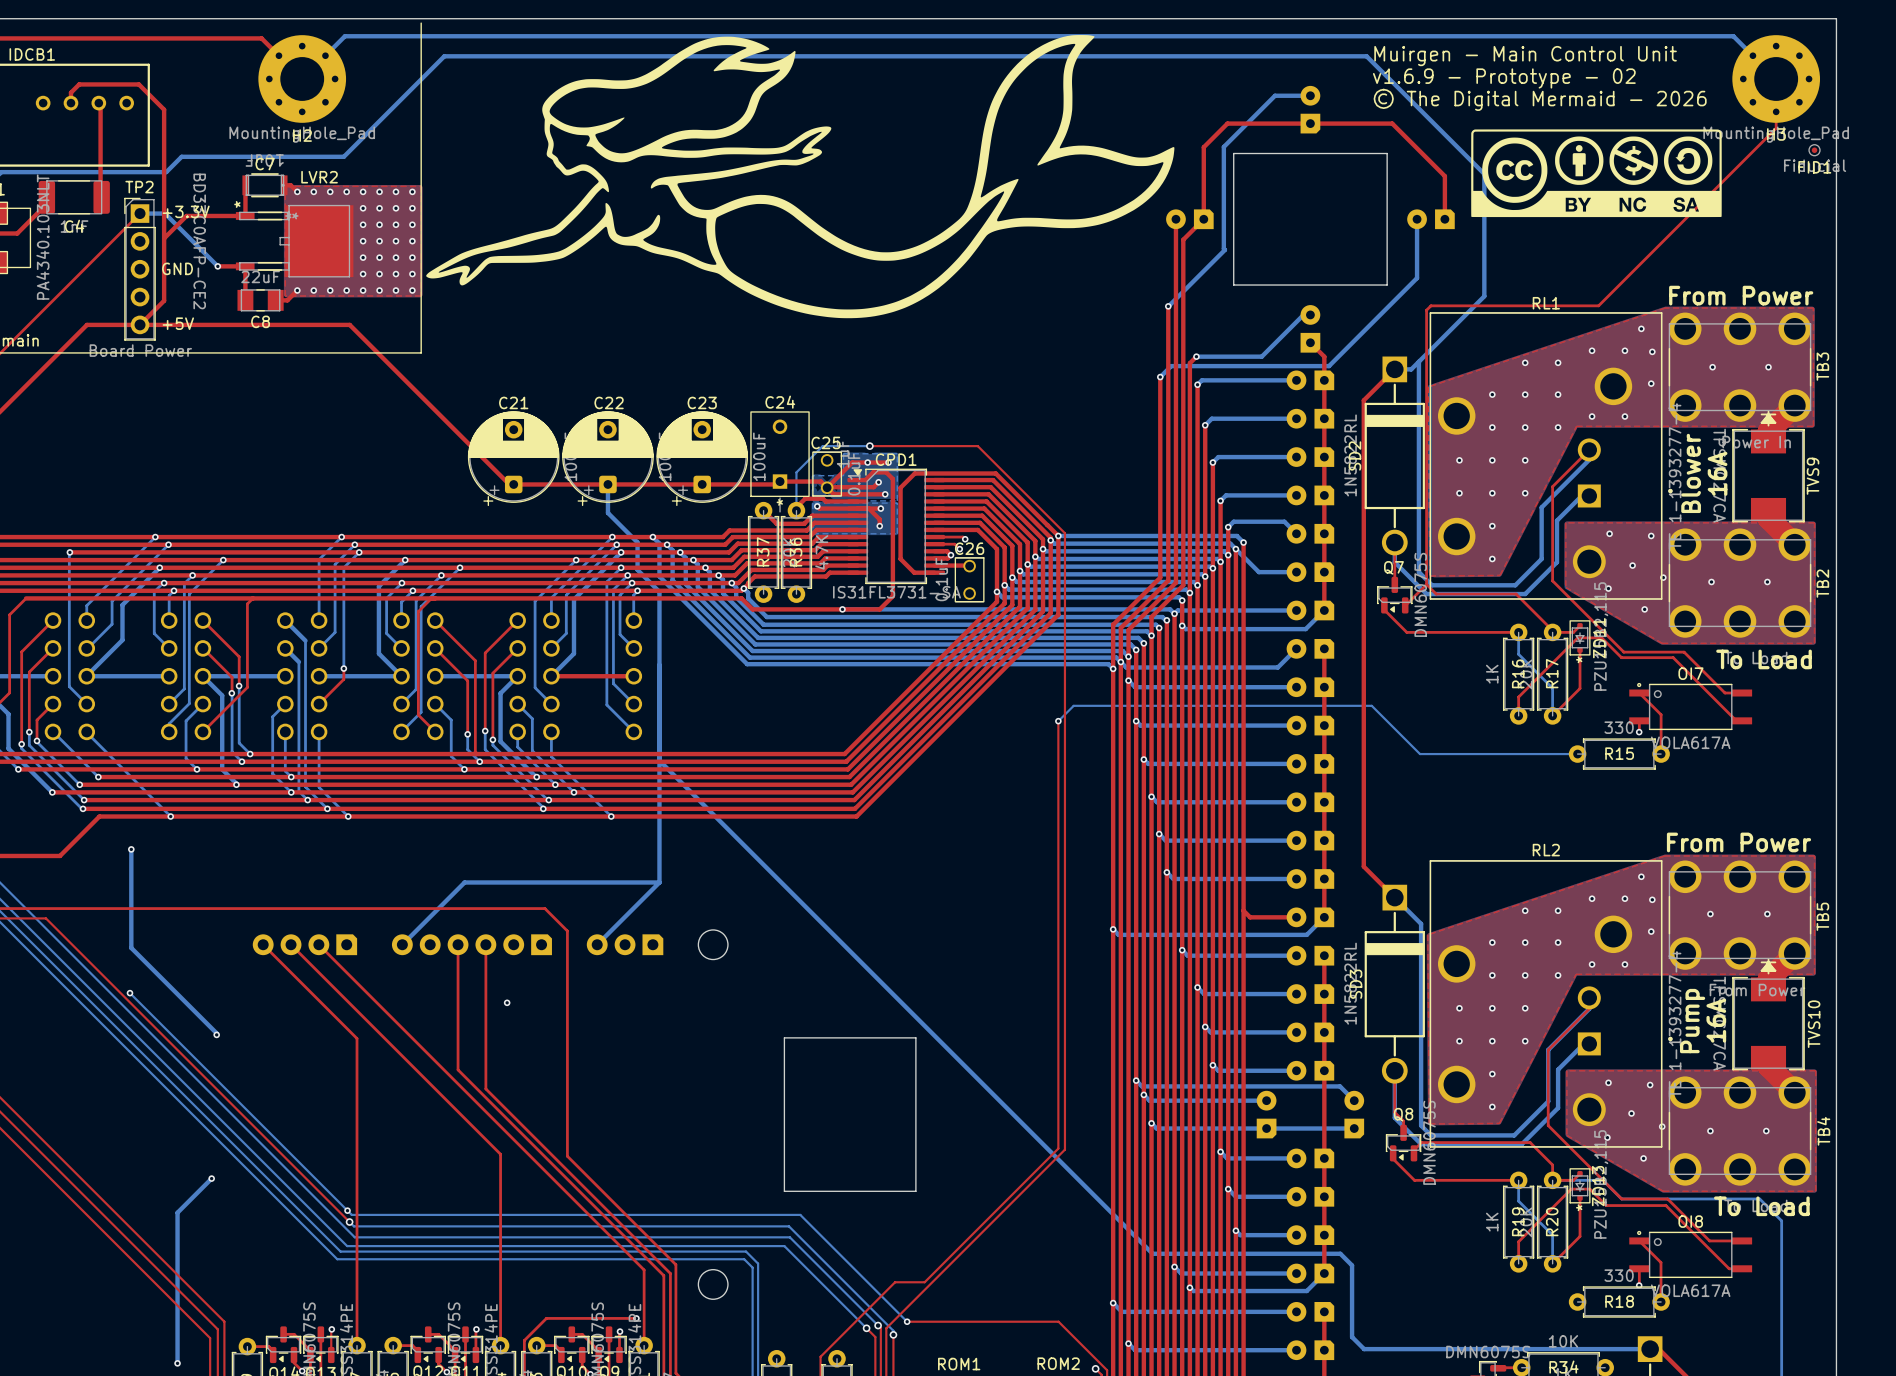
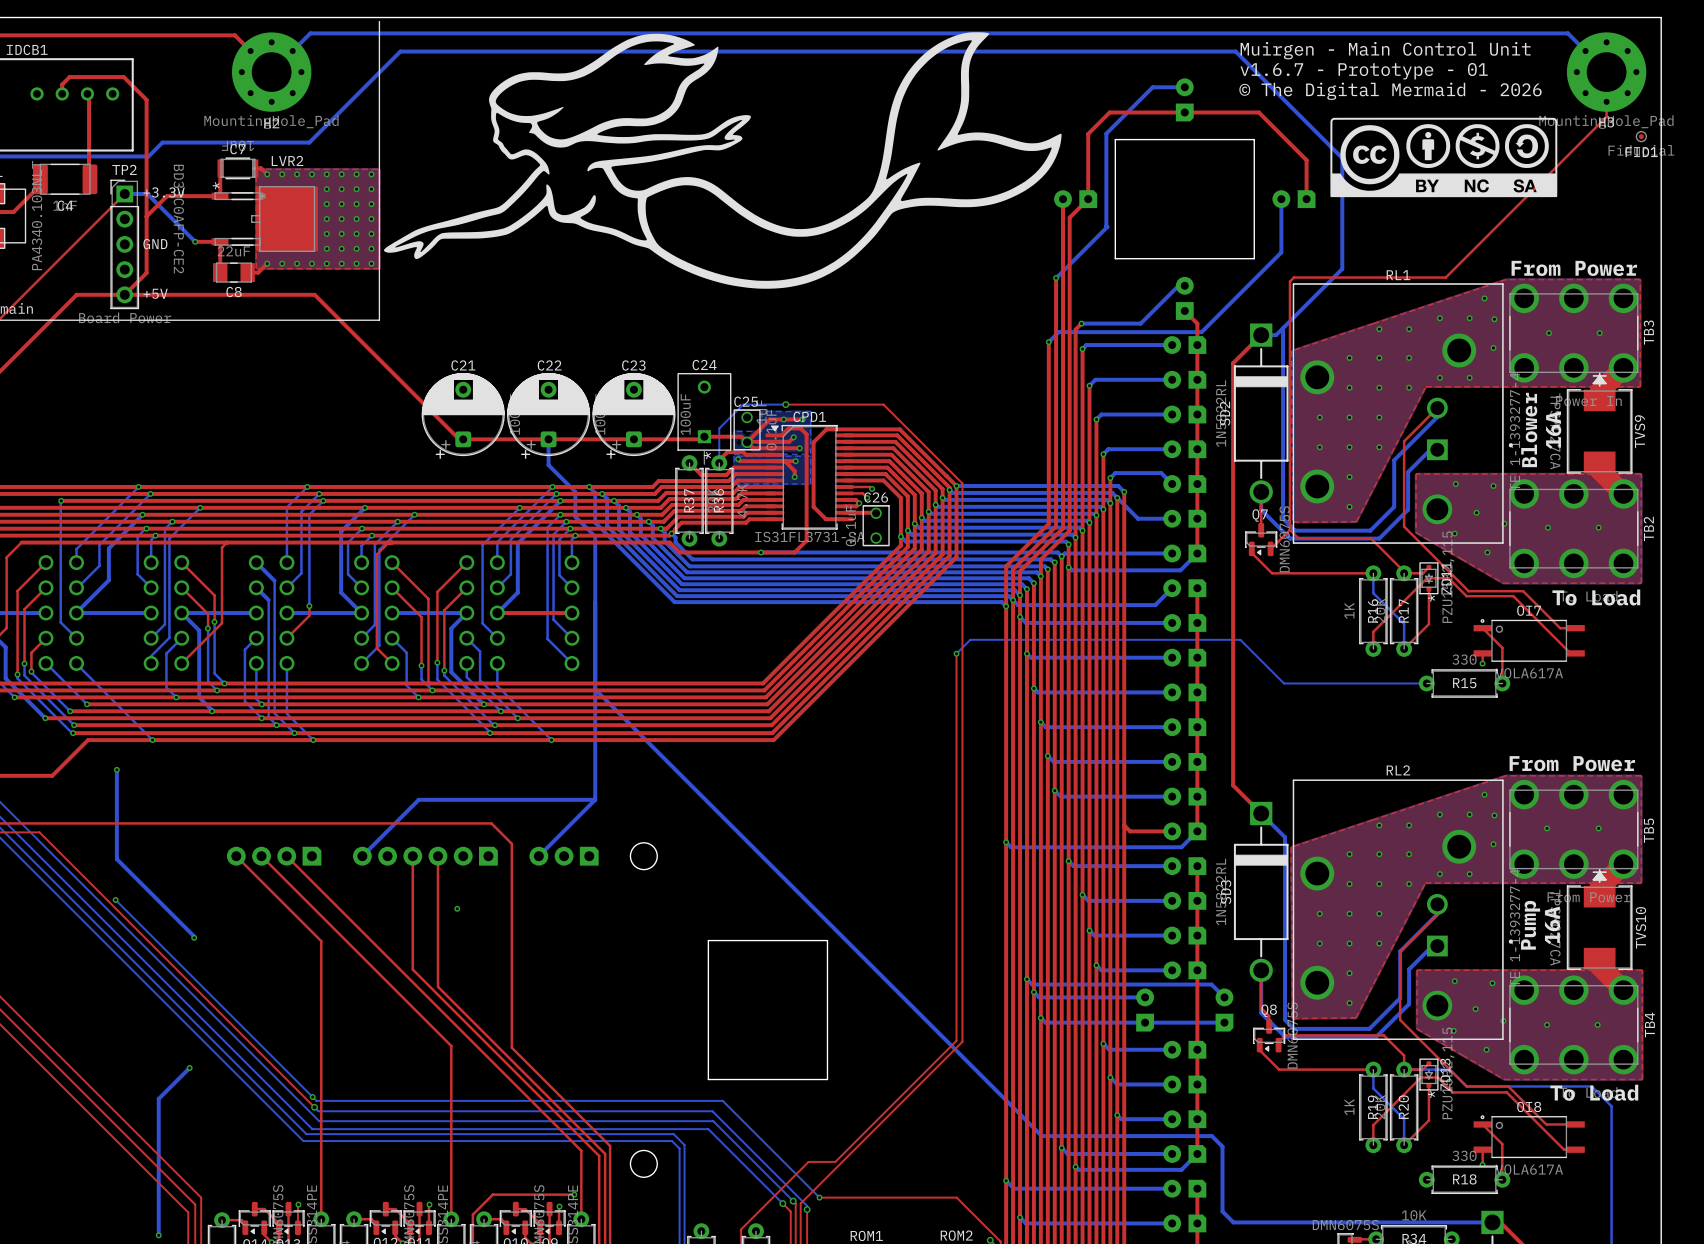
text: v1.6.9 - Prototype - 02 (1504, 78) -> v1.6.7 - Prototype - 01 (1364, 71)

